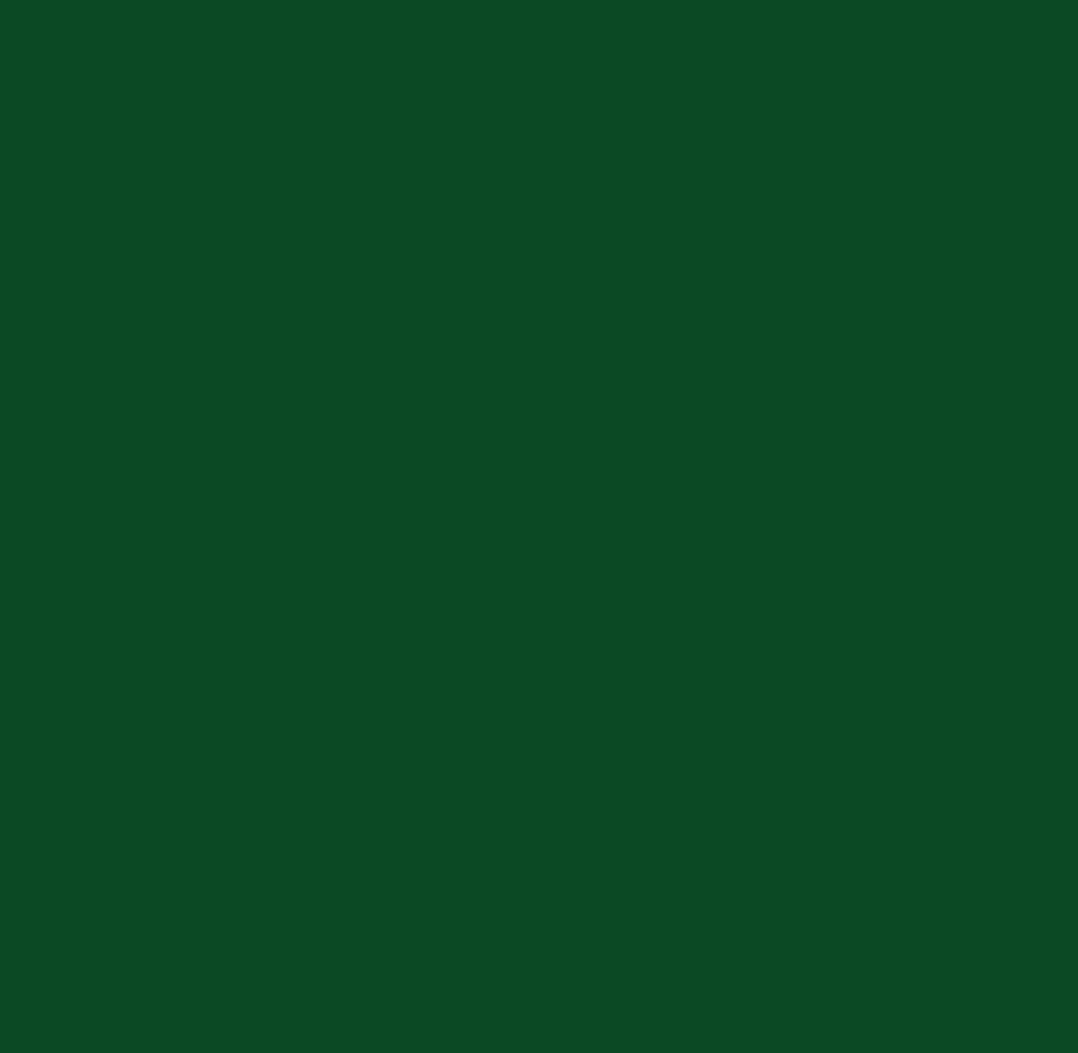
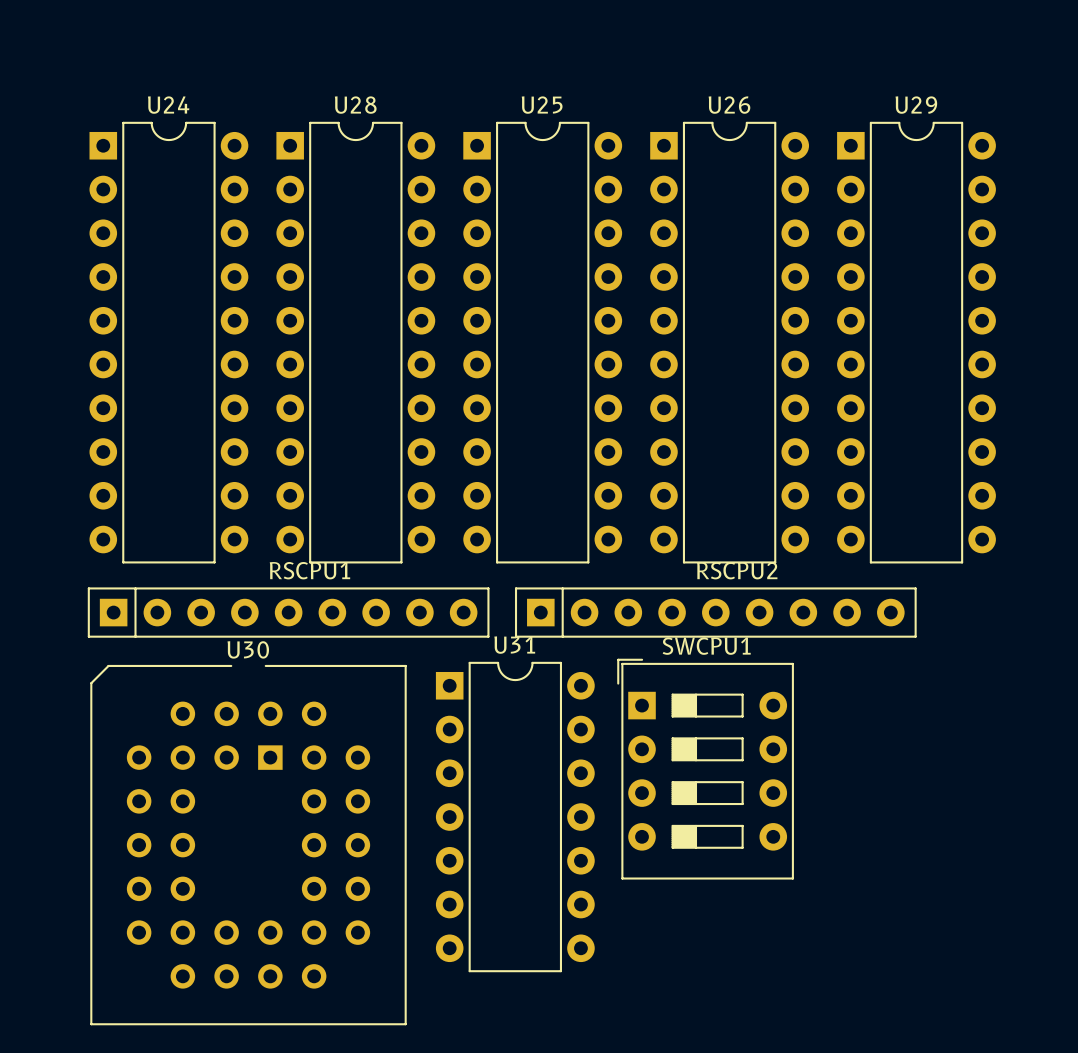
U24: none -> (168, 342)
U28: none -> (355, 342)
U25: none -> (542, 342)
U26: none -> (729, 342)
U29: none -> (916, 342)
RSCPU1: none -> (288, 612)
RSCPU2: none -> (715, 612)
SWCPU1: none -> (705, 769)
U31: none -> (515, 817)
U30: none -> (248, 845)

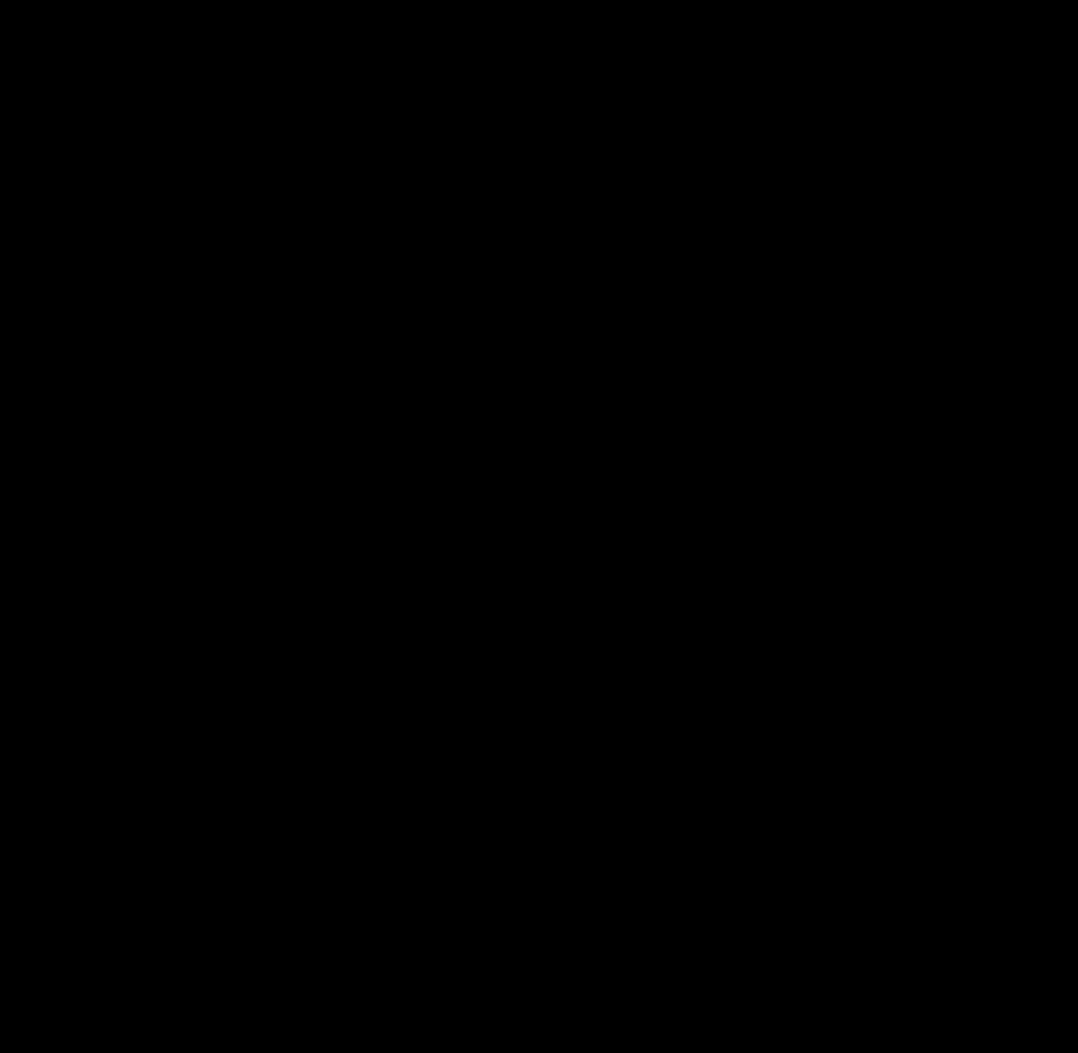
U24: (168, 342) -> none
U28: (355, 342) -> none
U25: (542, 342) -> none
U26: (729, 342) -> none
U29: (916, 342) -> none
RSCPU1: (288, 612) -> none
RSCPU2: (715, 612) -> none
SWCPU1: (705, 769) -> none
U31: (515, 817) -> none
U30: (248, 845) -> none

